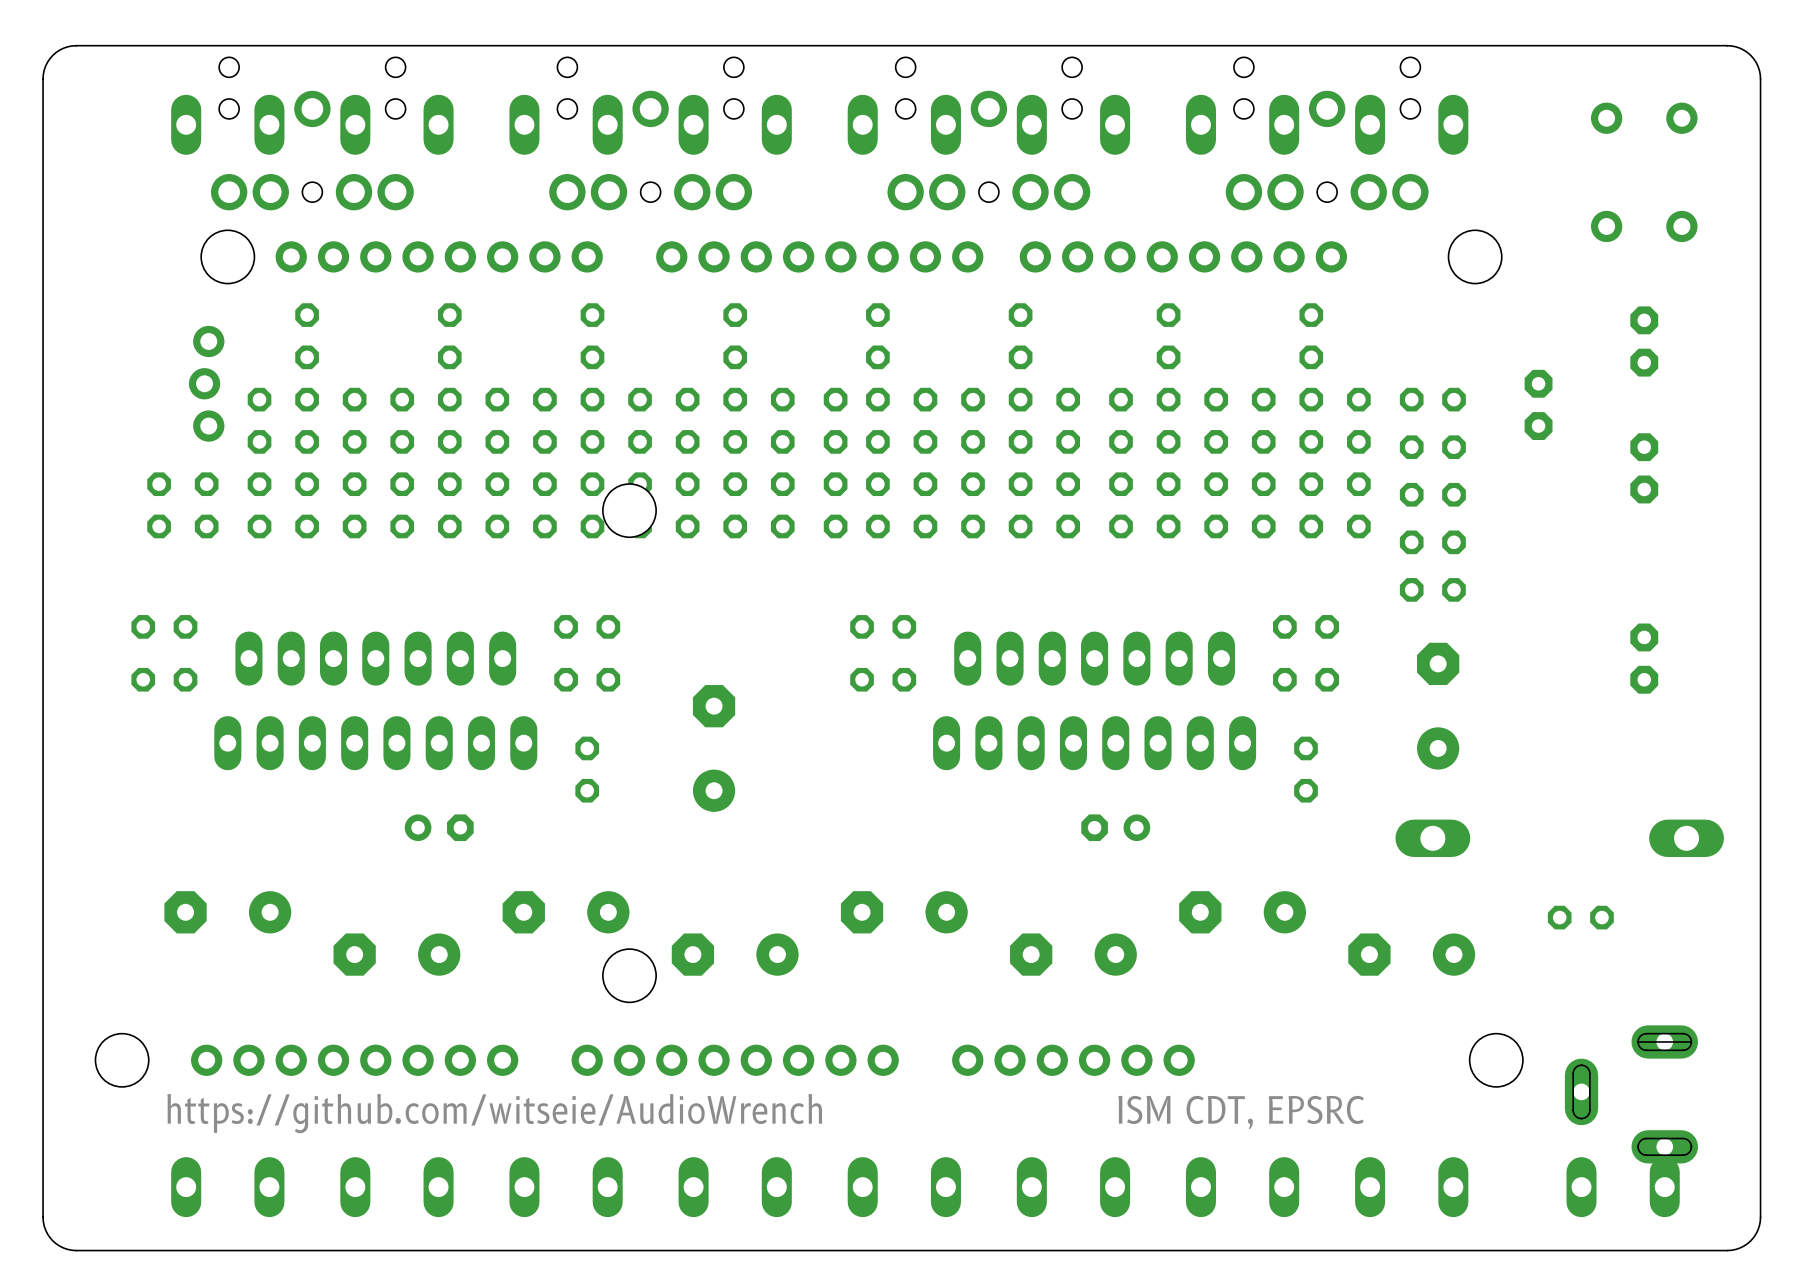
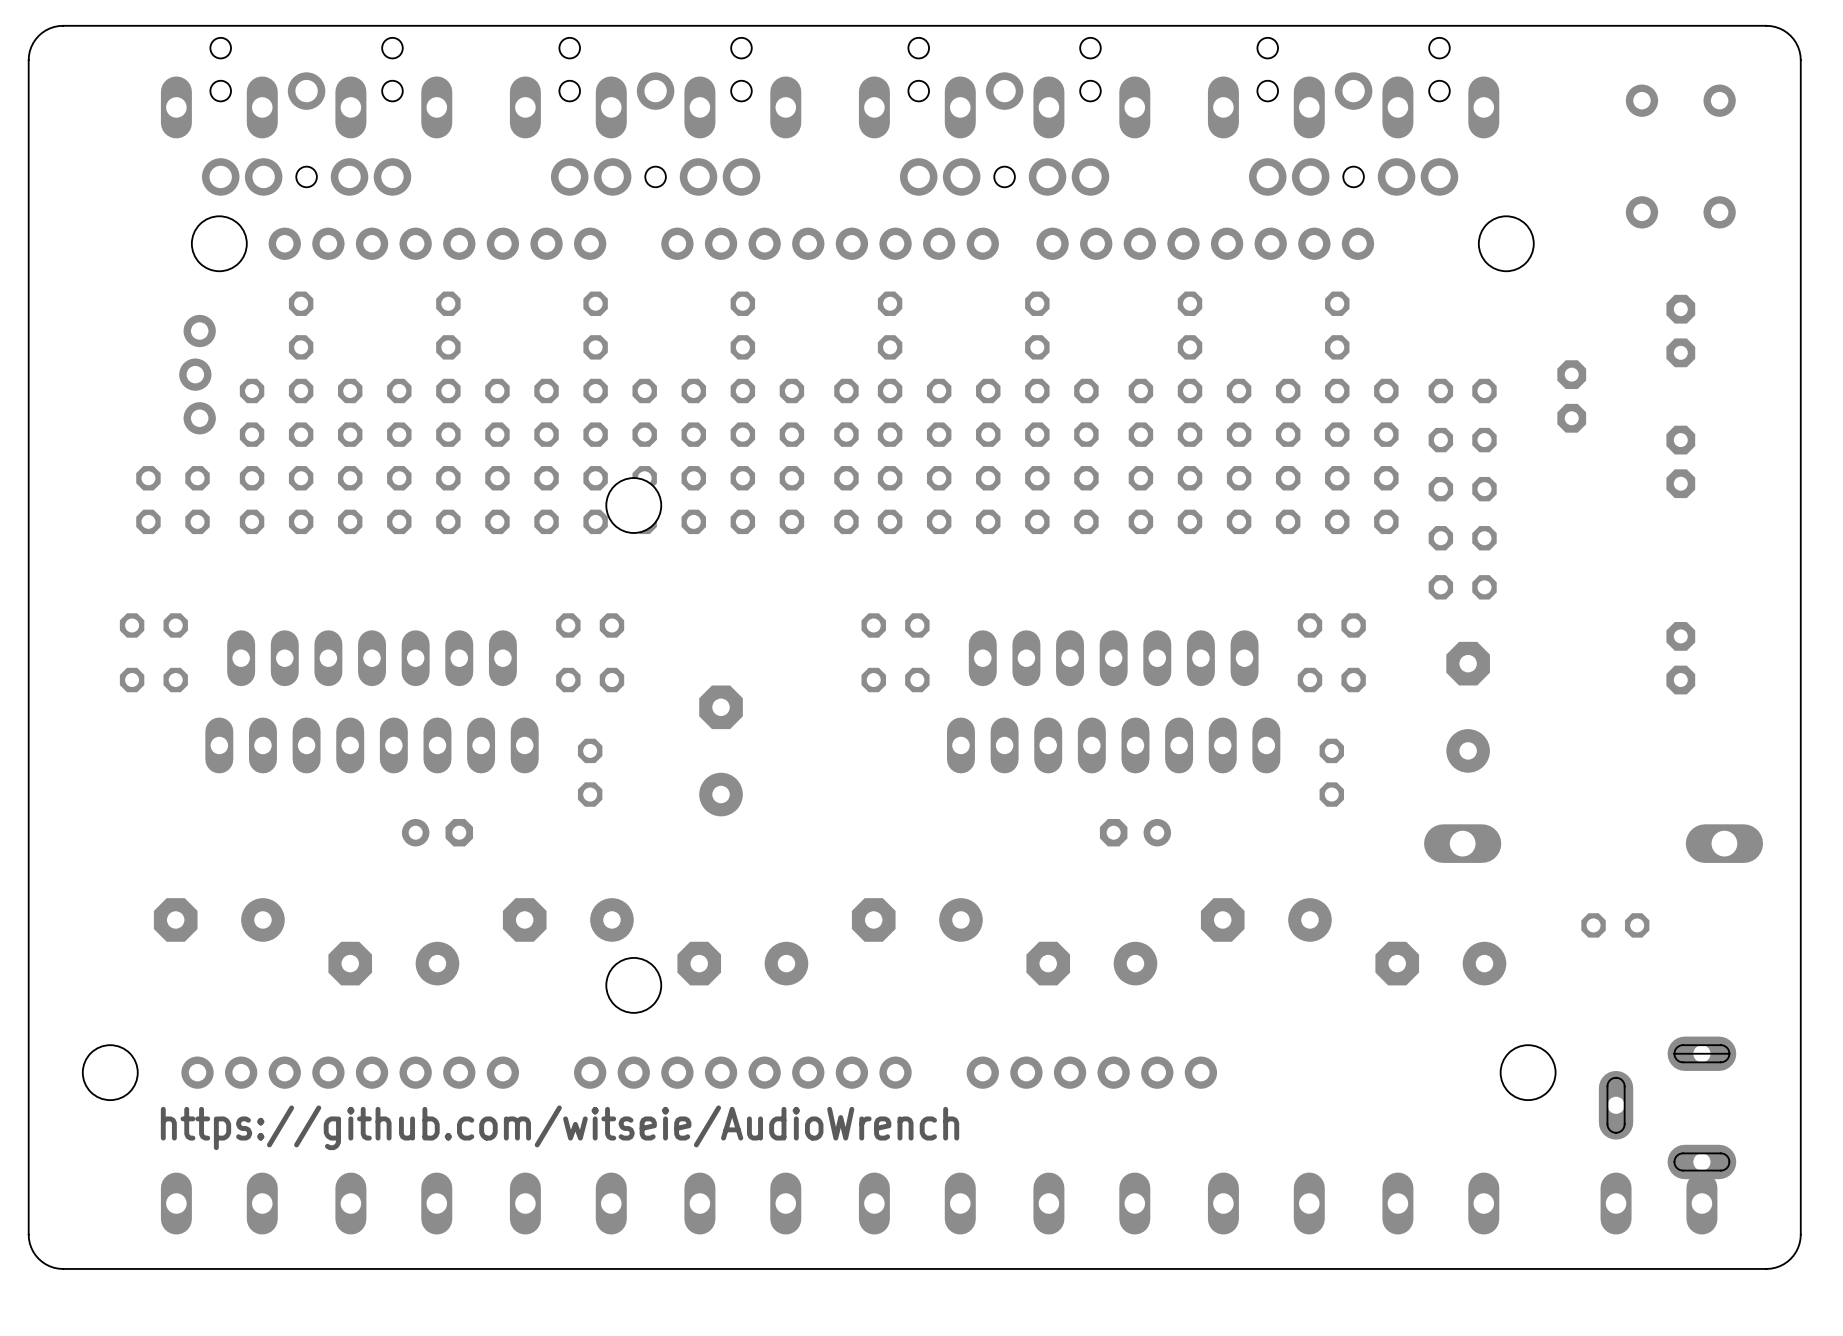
text: ISM CDT, EPSRC (1241, 1112) -> none

